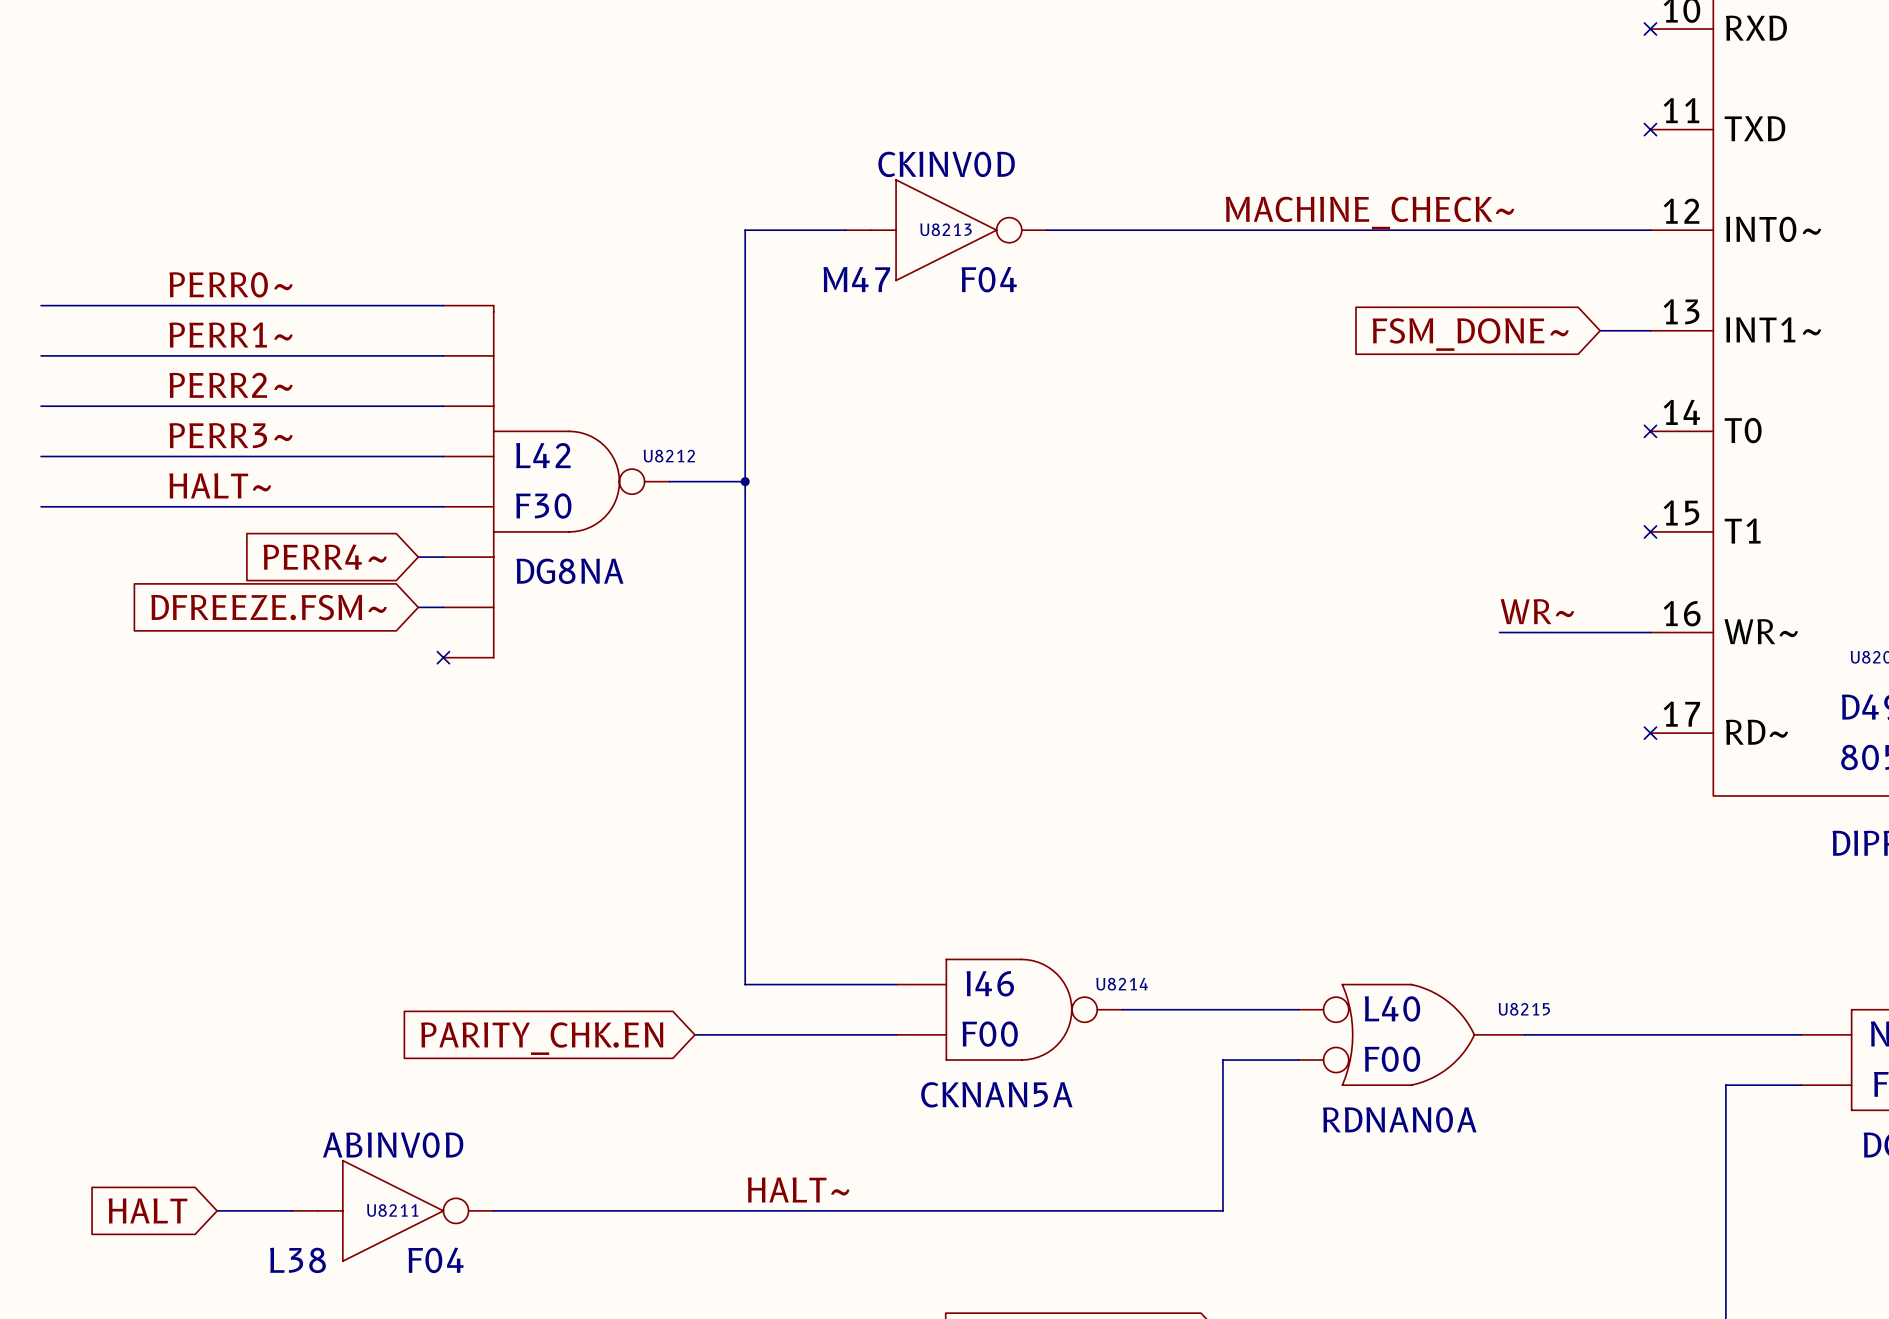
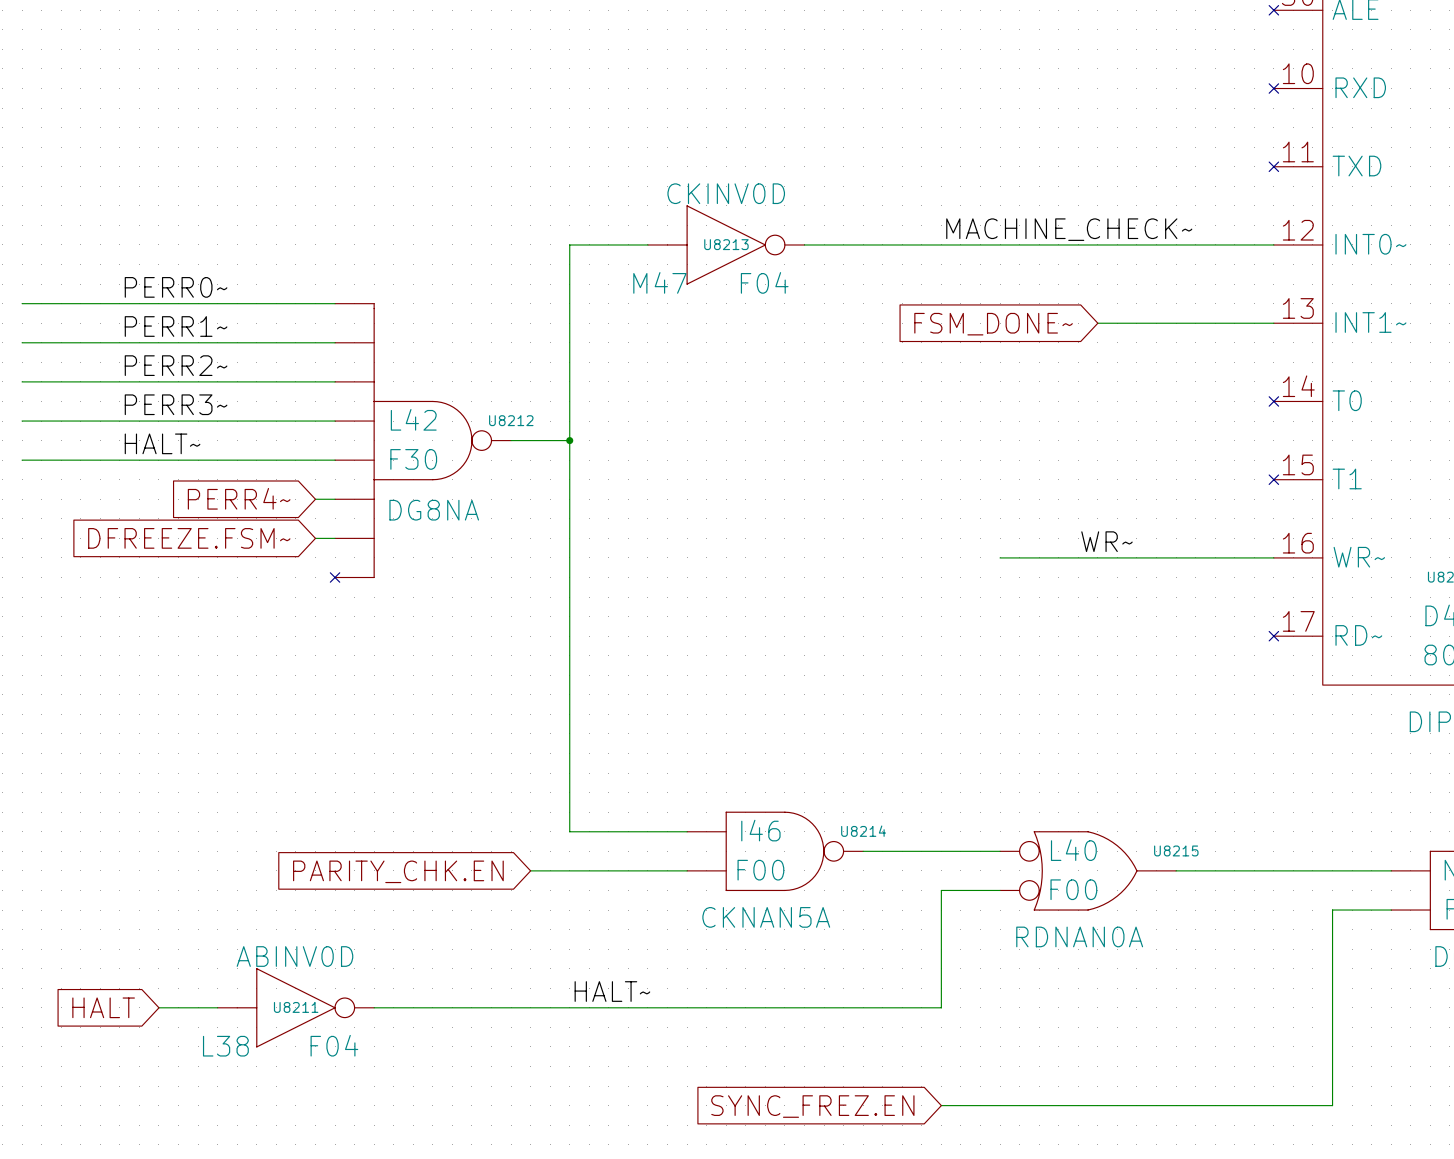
wire: none -> (1097, 323) (1234, 323)
global label position: FSM_DONE~ (1470, 334) -> FSM_DONE~ (993, 324)
label position: WR~ (1537, 611) -> WR~ (1106, 541)
wire: none -> (1000, 557) (1156, 557)

